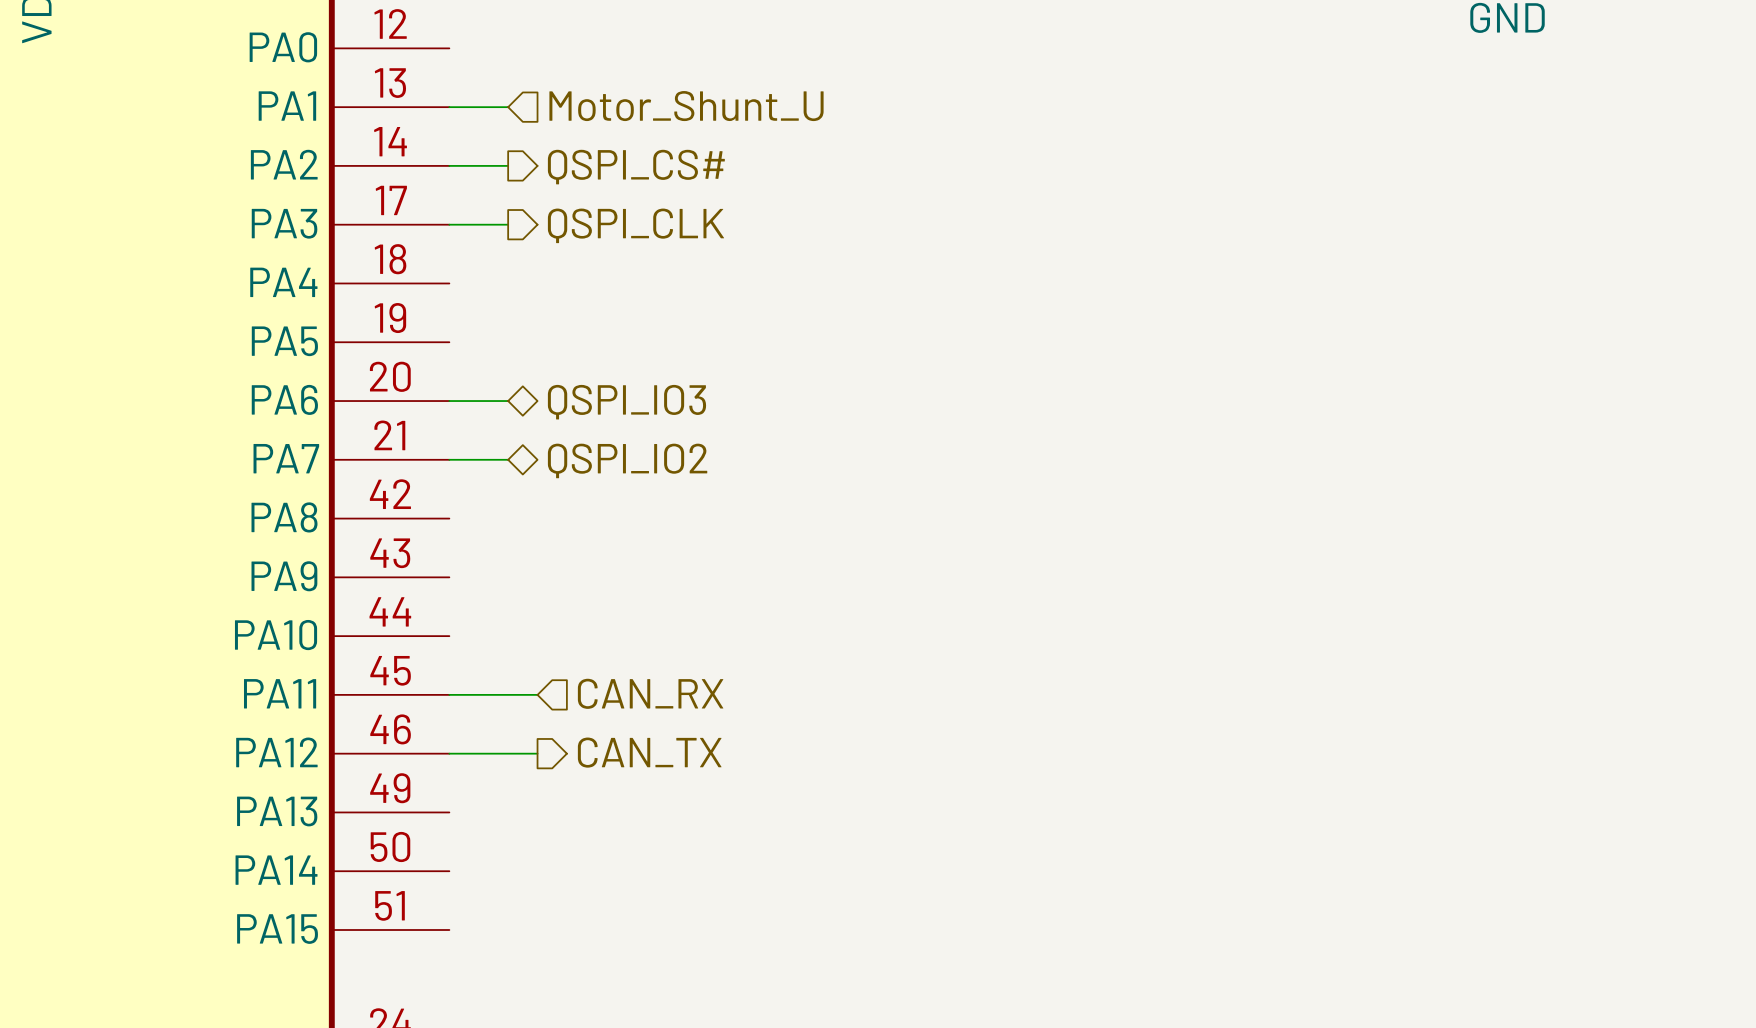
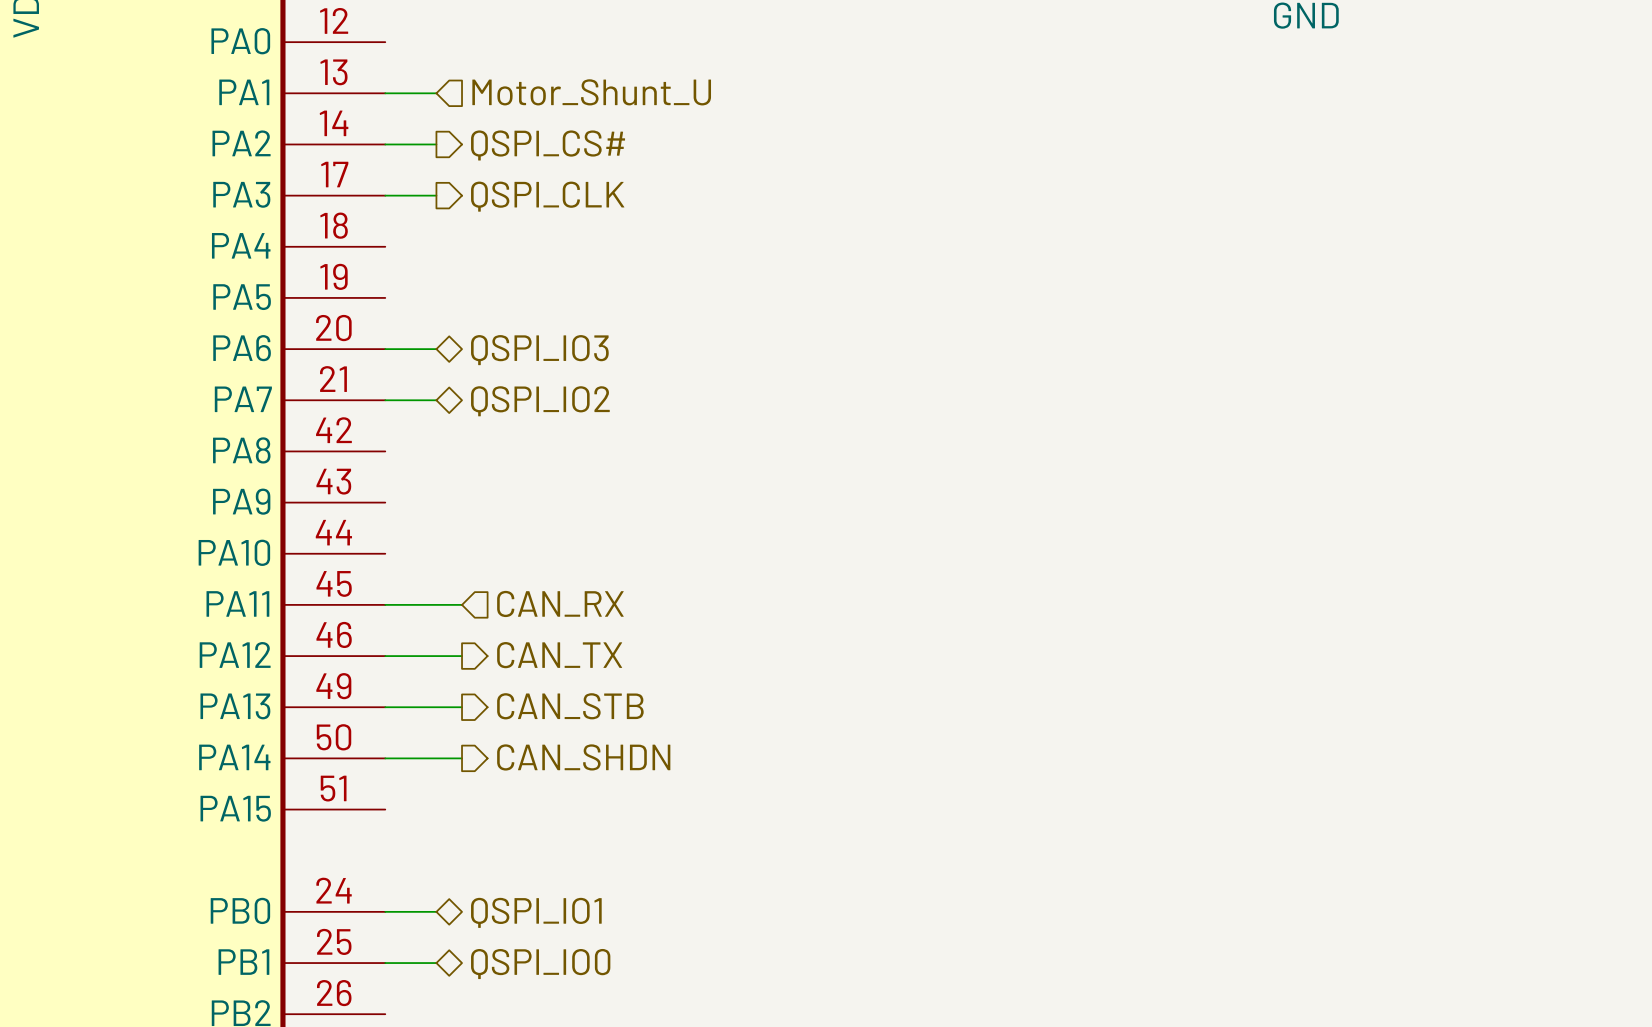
hierarchical label: none -> CAN_STB (570, 706)
wire: none -> (385, 707) (462, 707)
hierarchical label: none -> CAN_SHDN (583, 757)
wire: none -> (385, 758) (462, 758)

